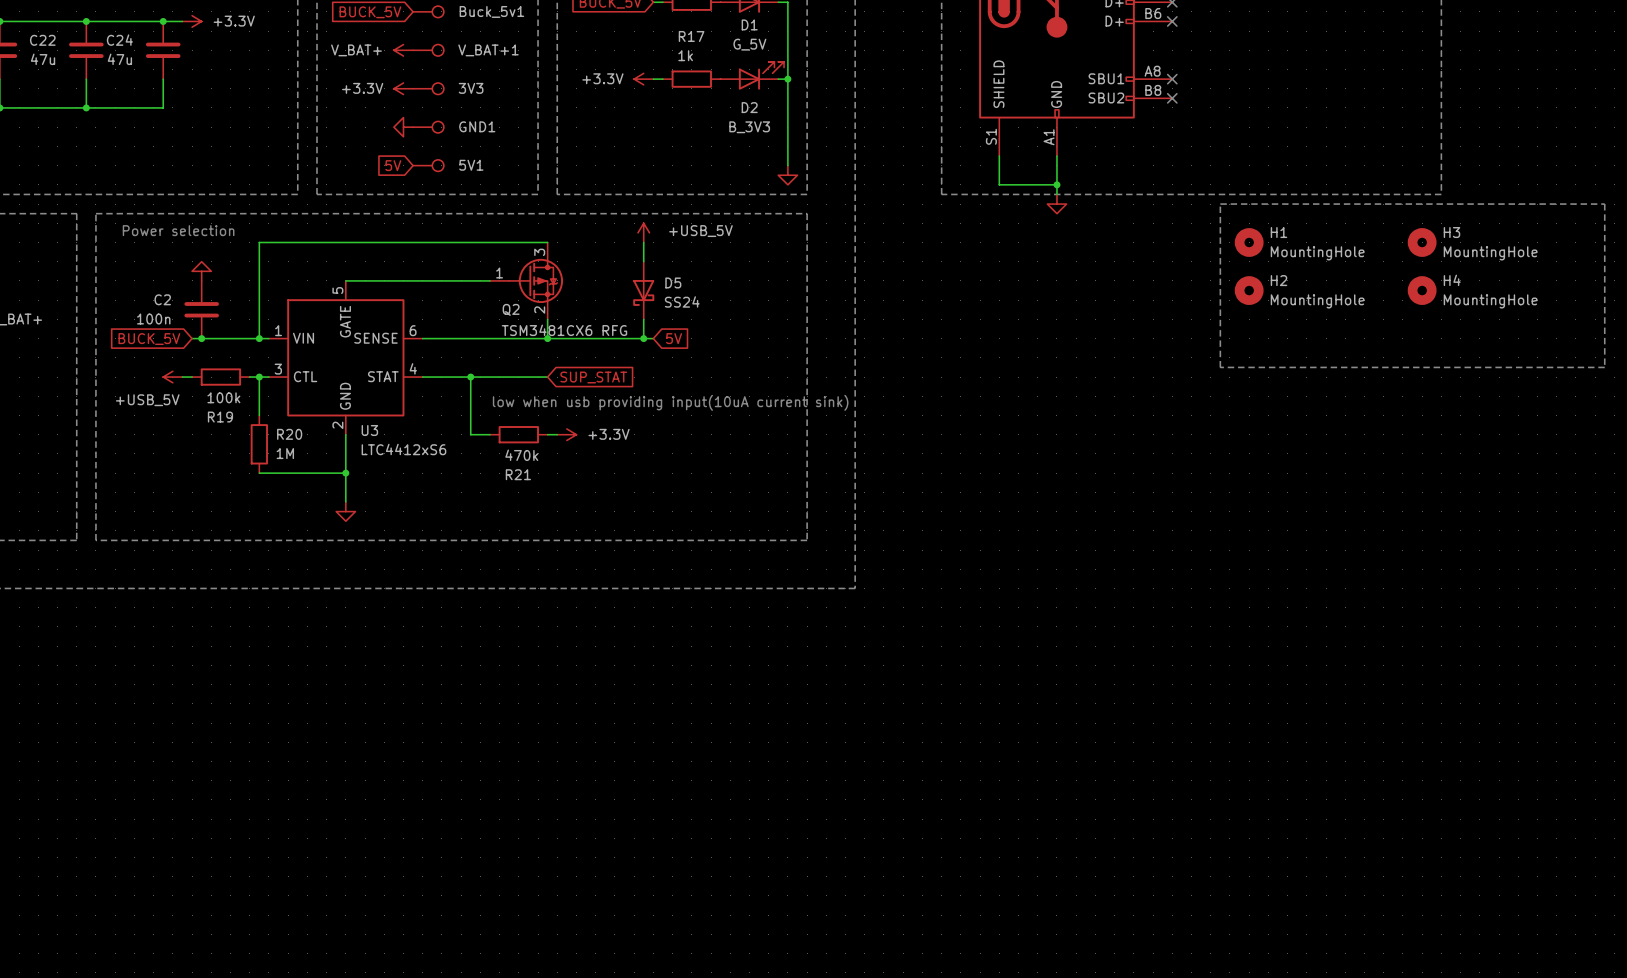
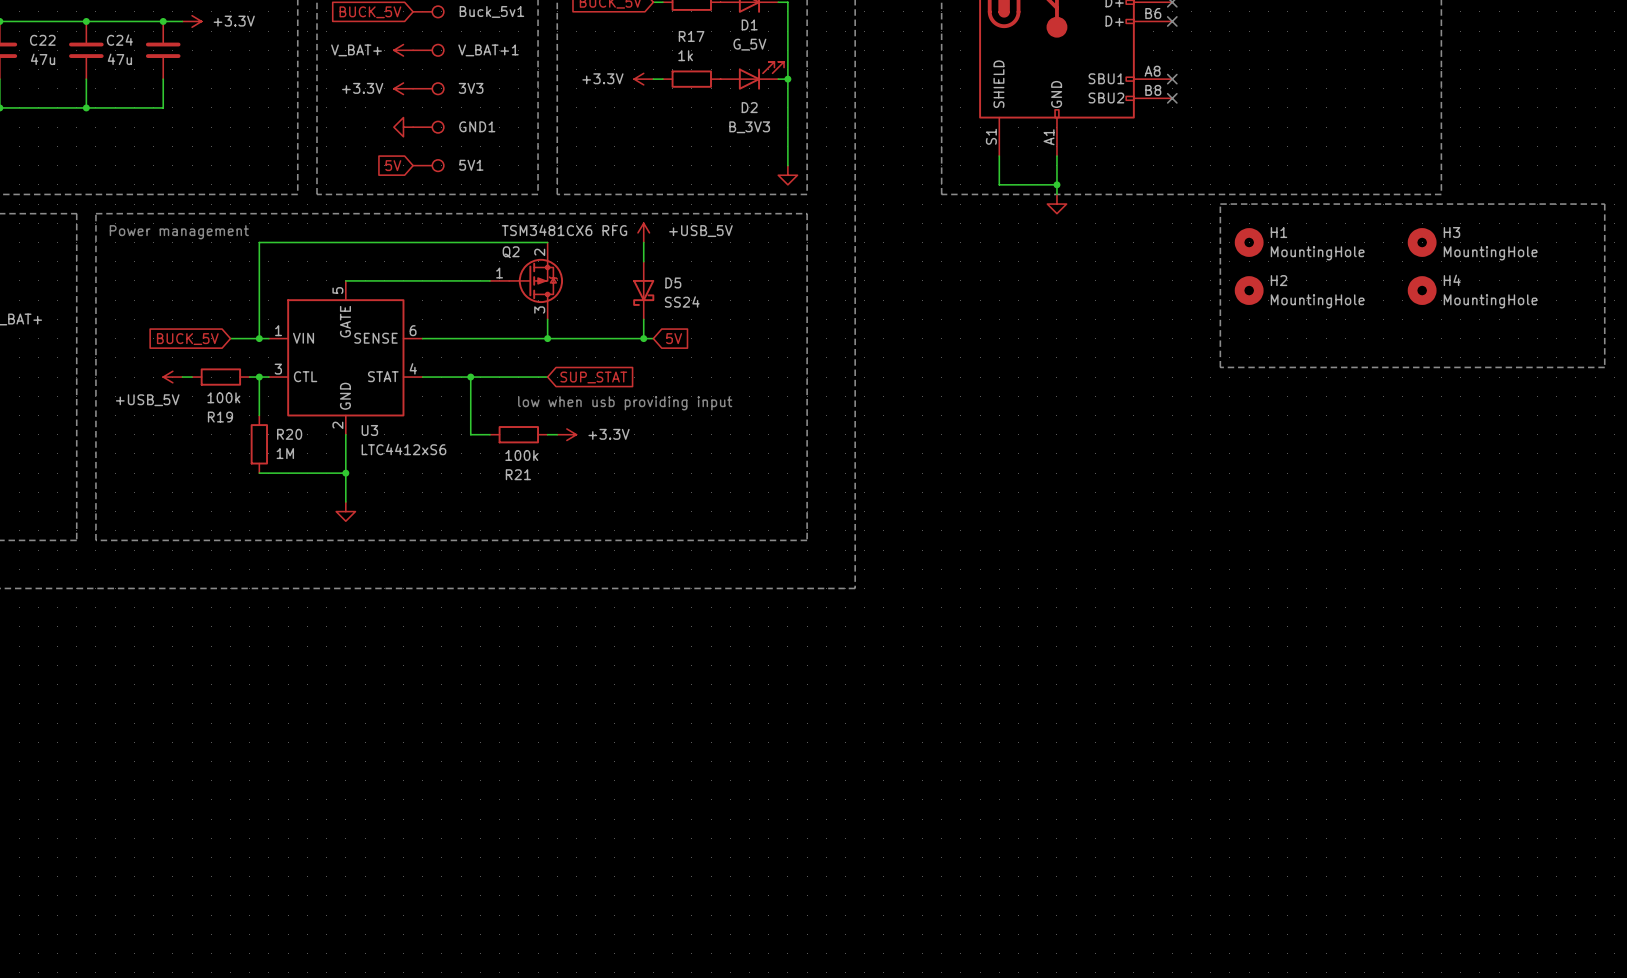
text: Power selection (178, 230) -> Power management (179, 232)
power symbol: (201, 271) -> none
Q2 flip: as is (536, 280) -> up-down (536, 280)
C2: 100n (201, 309) -> none
wire: (192, 338) (230, 338) -> none
junction: (201, 338) -> none
global label position: BUCK_5V (149, 339) -> BUCK_5V (187, 339)
text: low when usb providing input(10uA current sink) (670, 402) -> low when usb providing input (625, 403)
R21 value: 470k (521, 455) -> 100k (521, 455)

